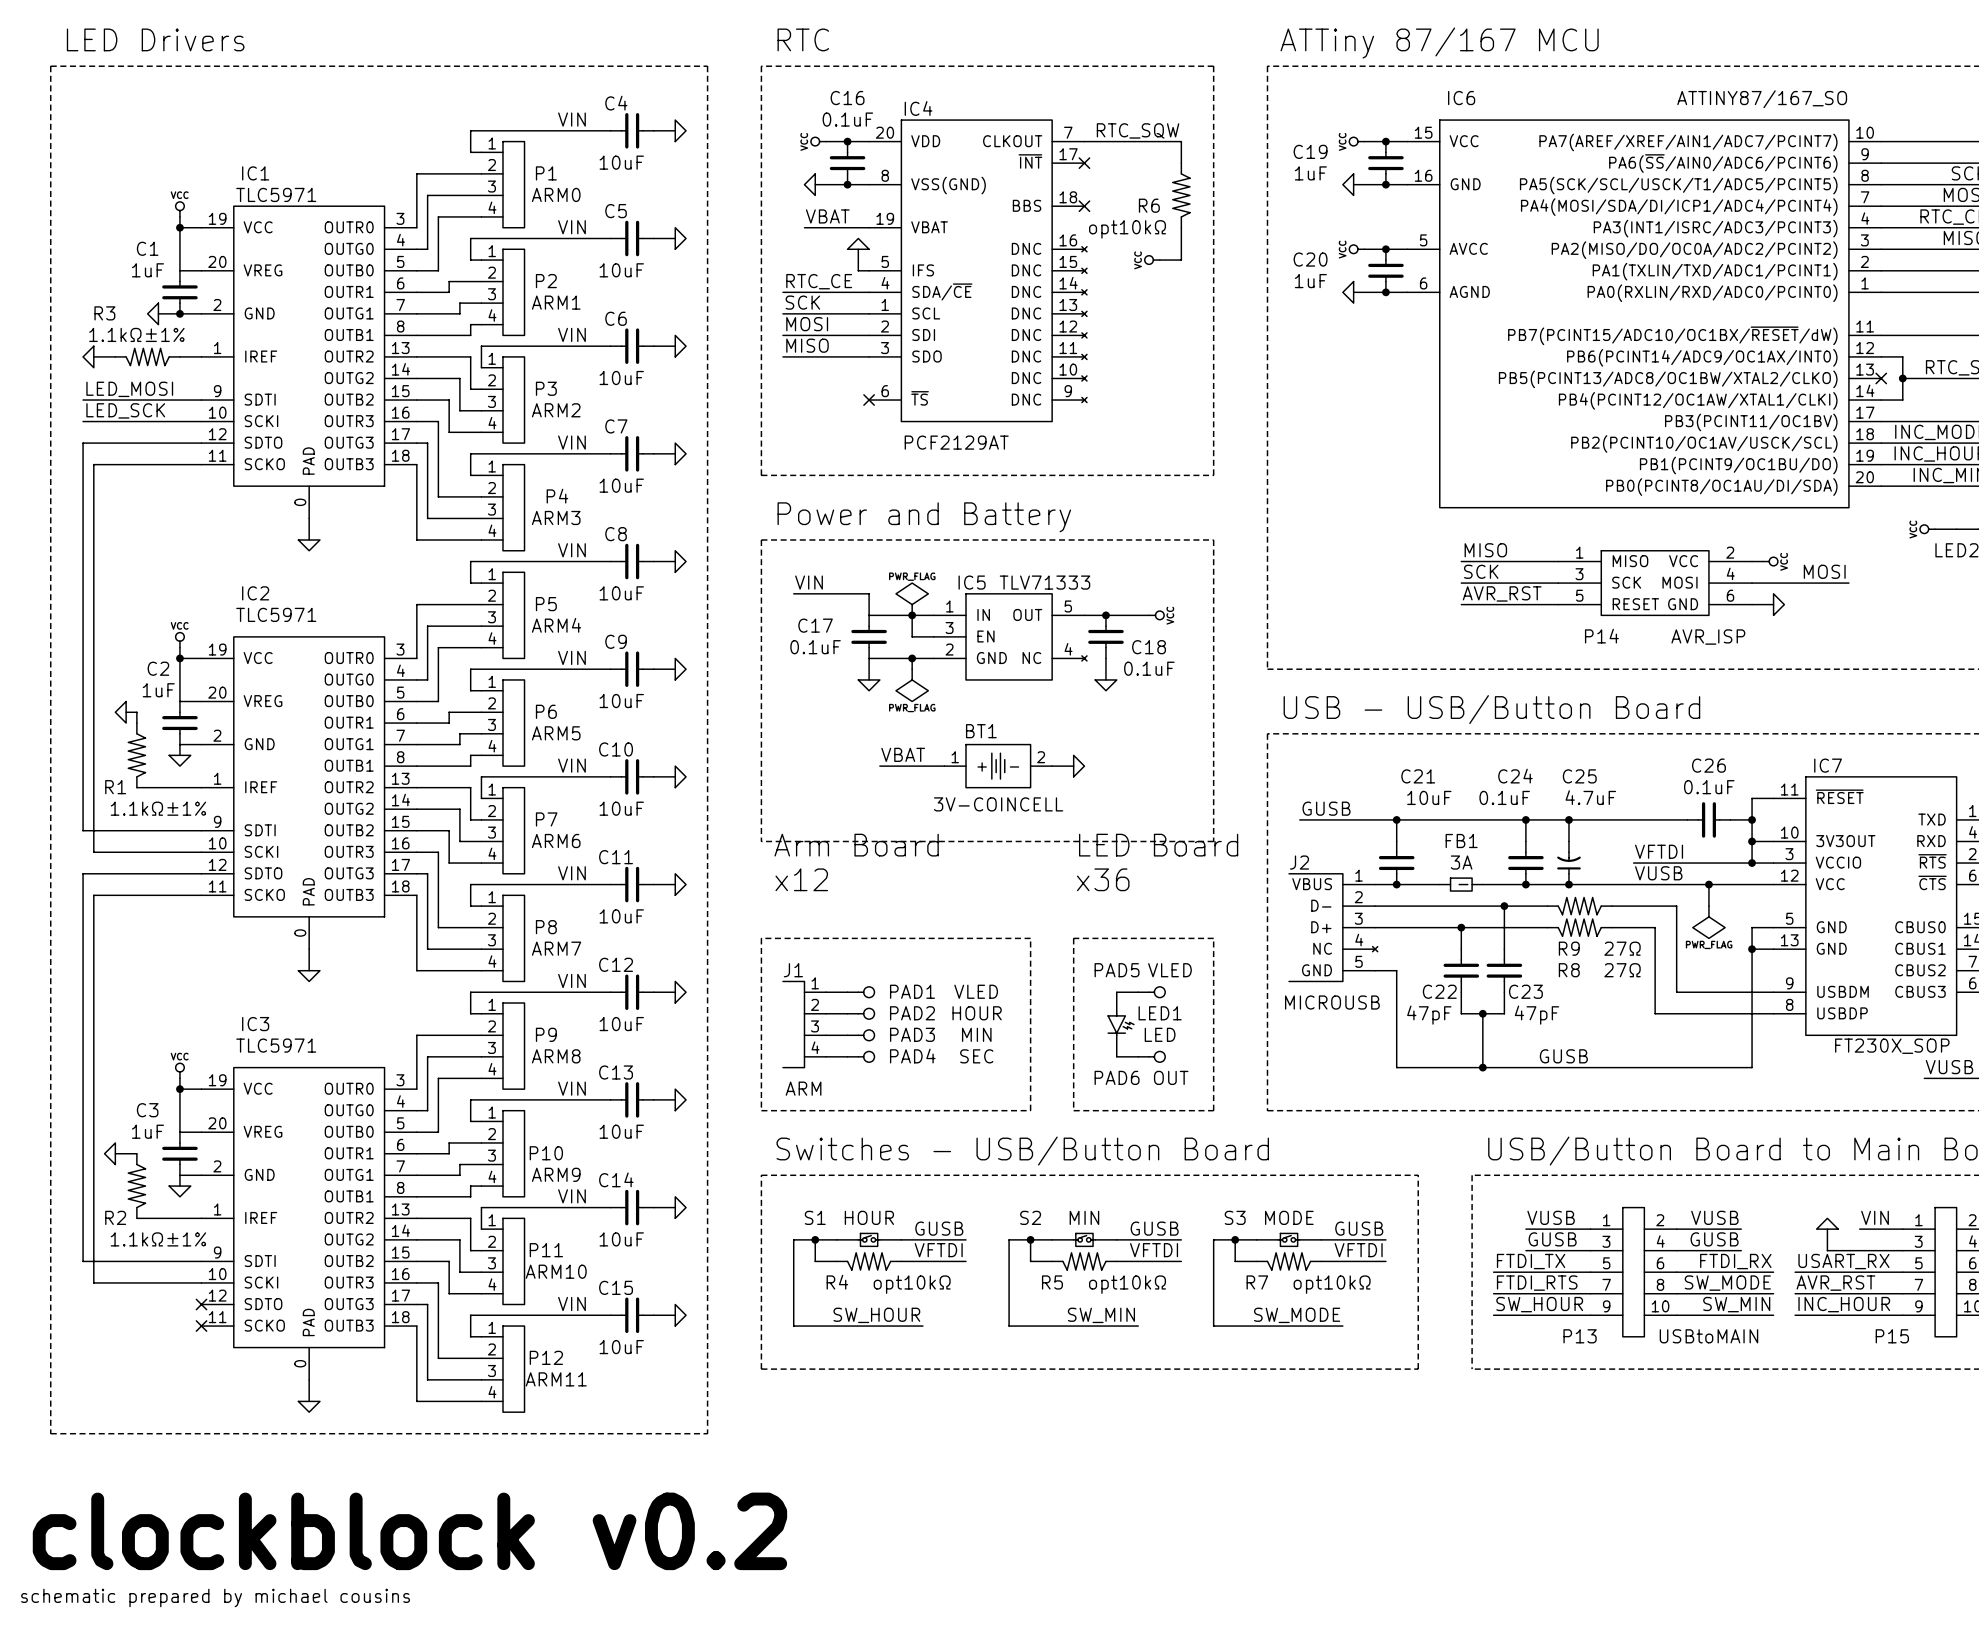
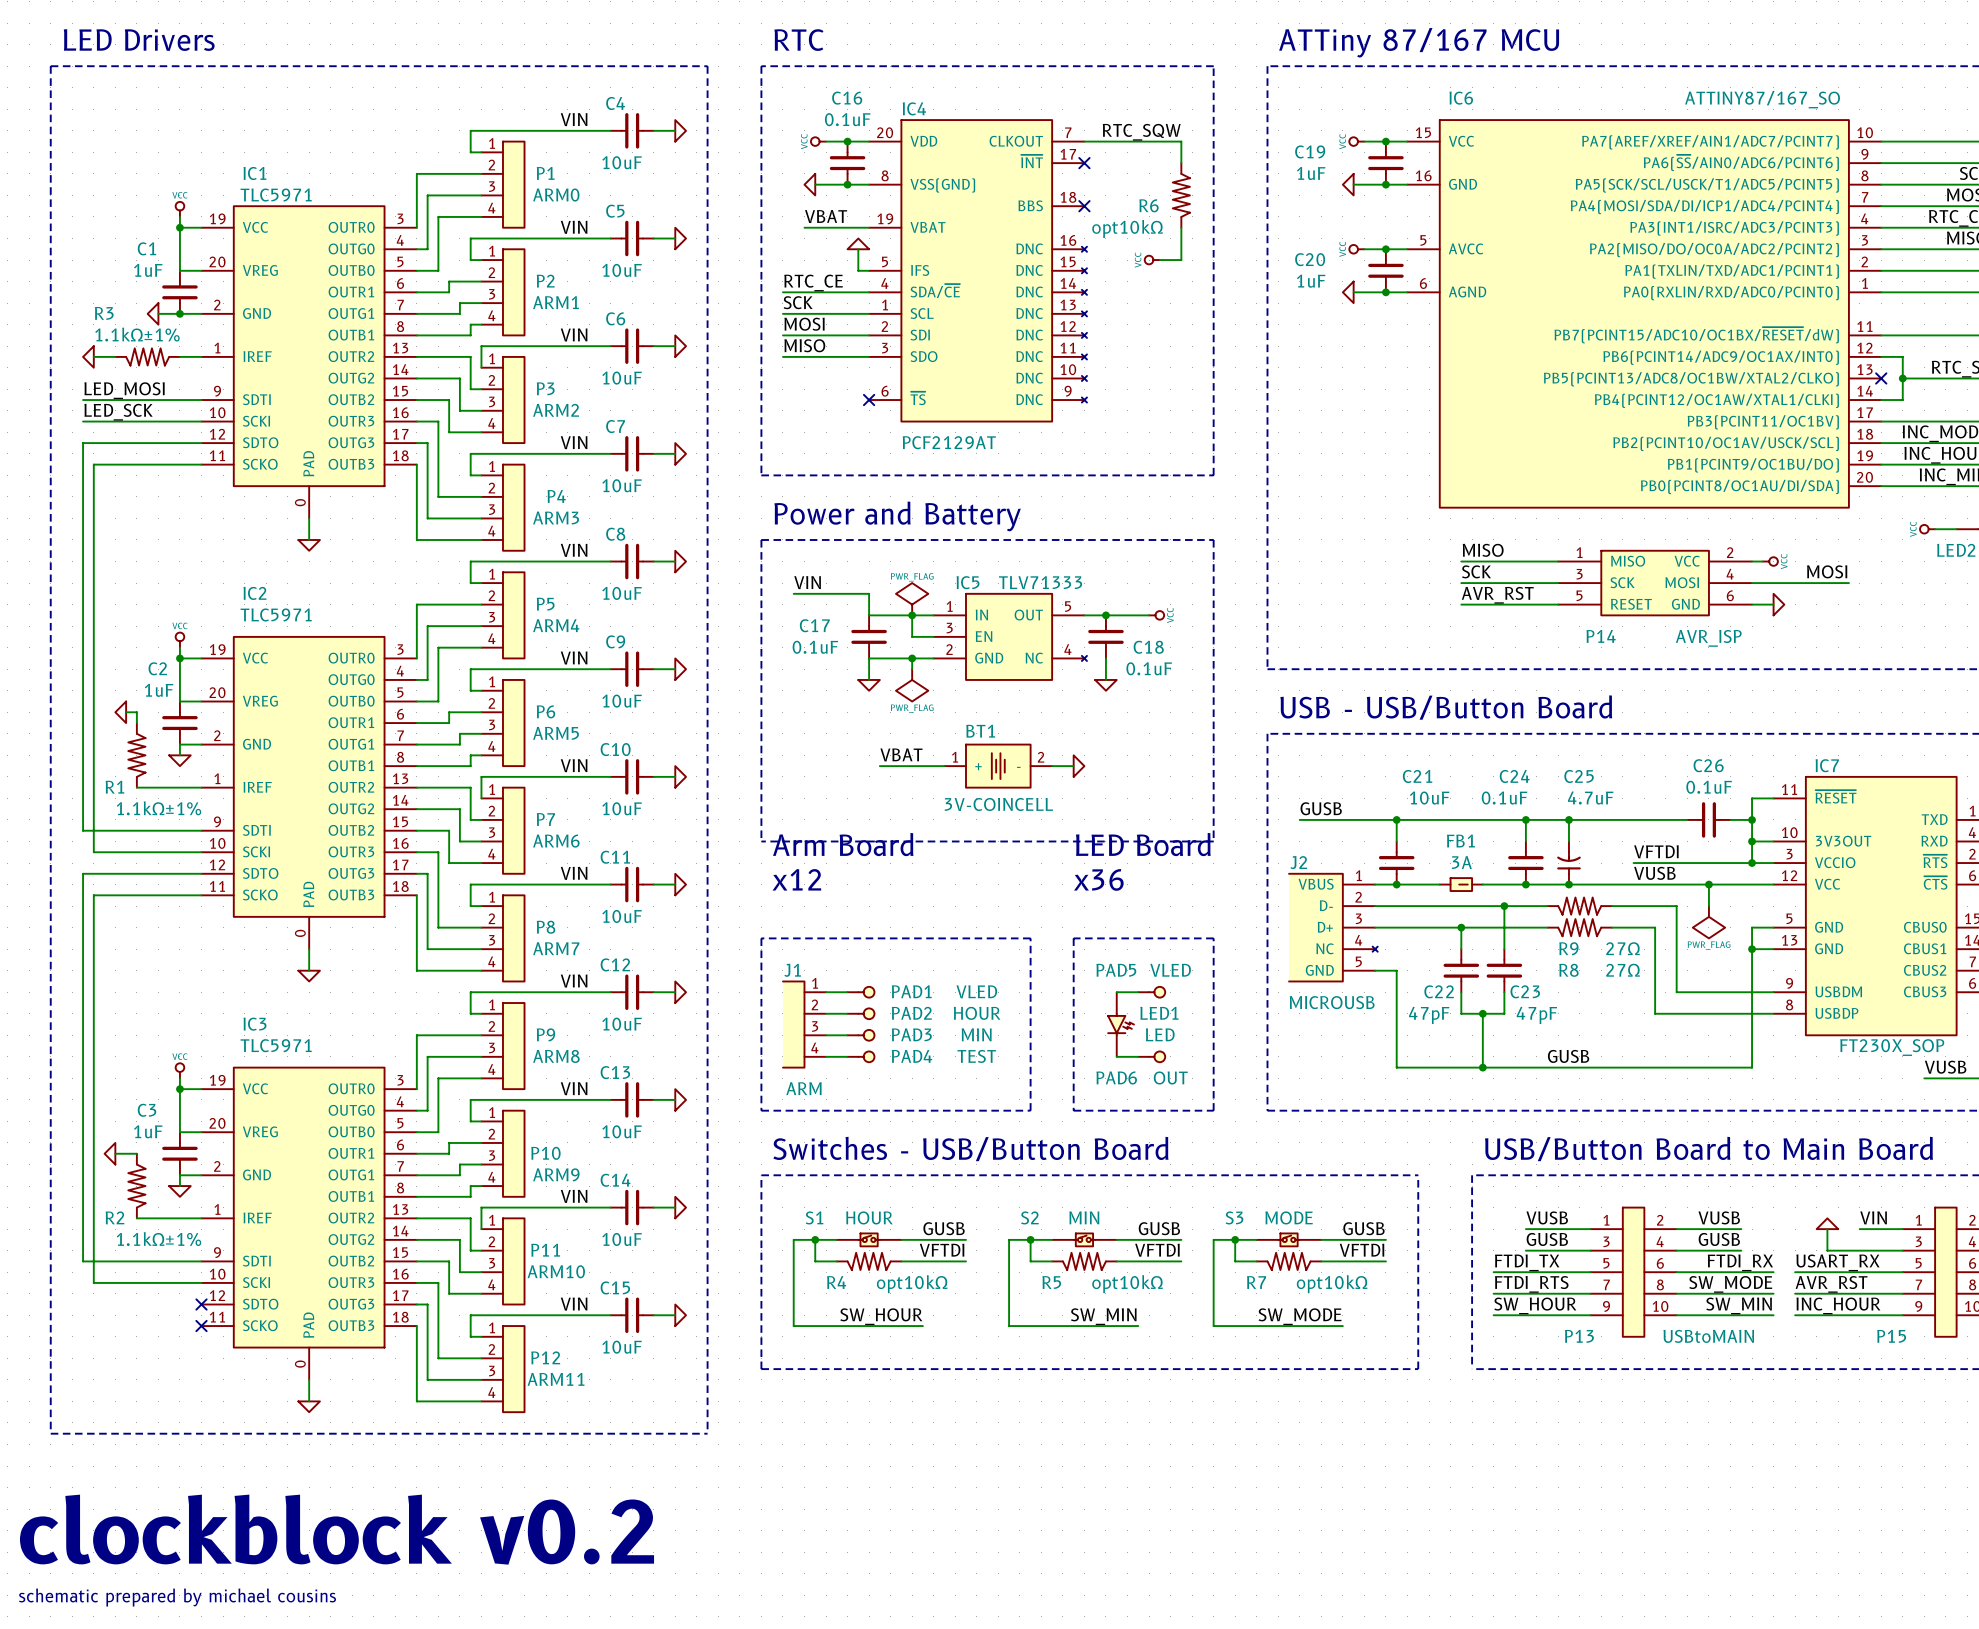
PAD4 value: SEC (976, 1056) -> TEST (976, 1056)

